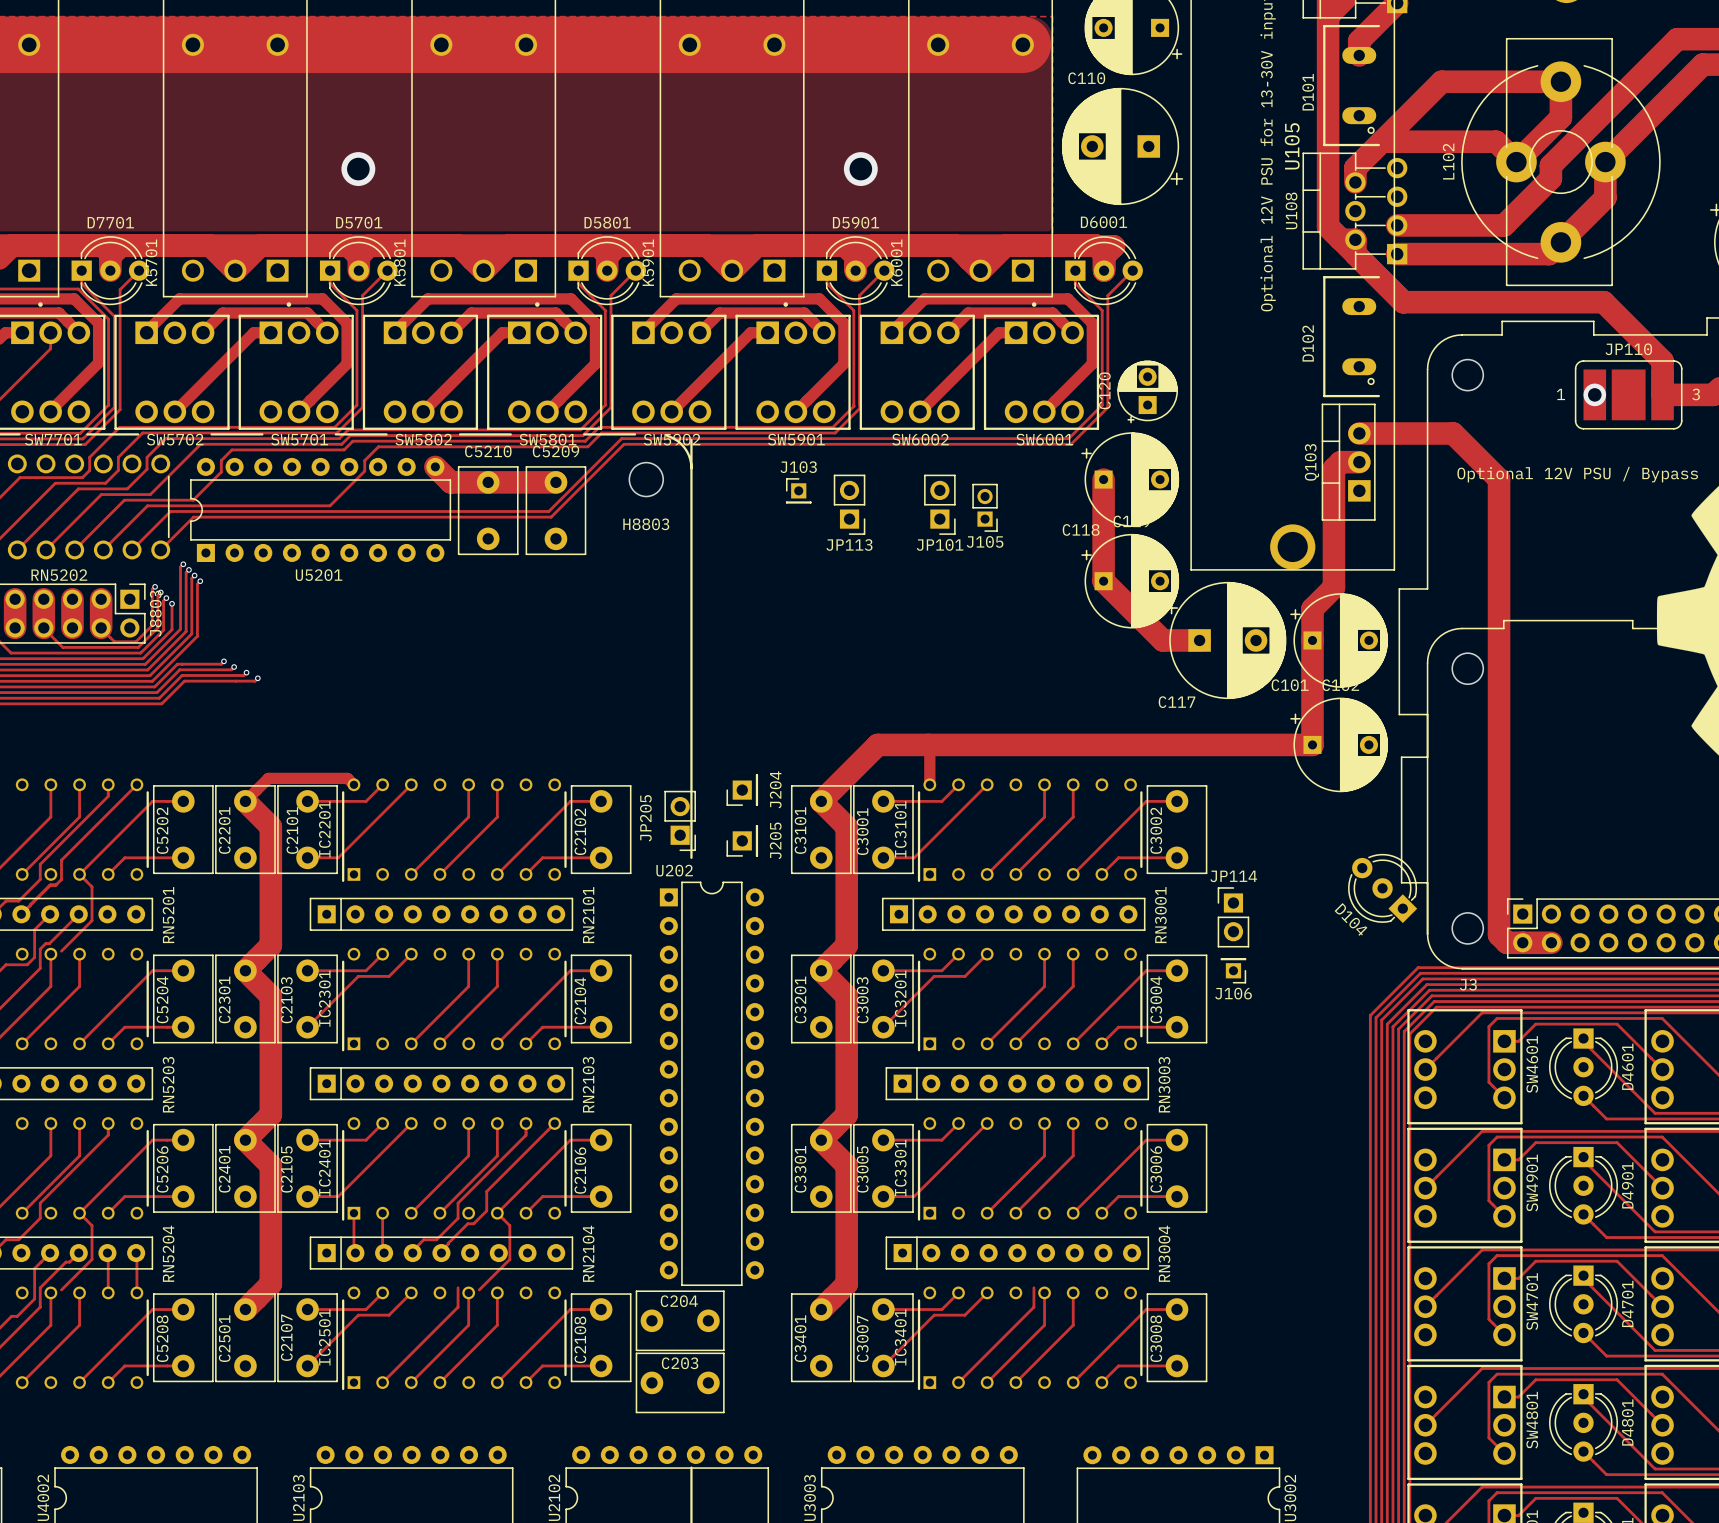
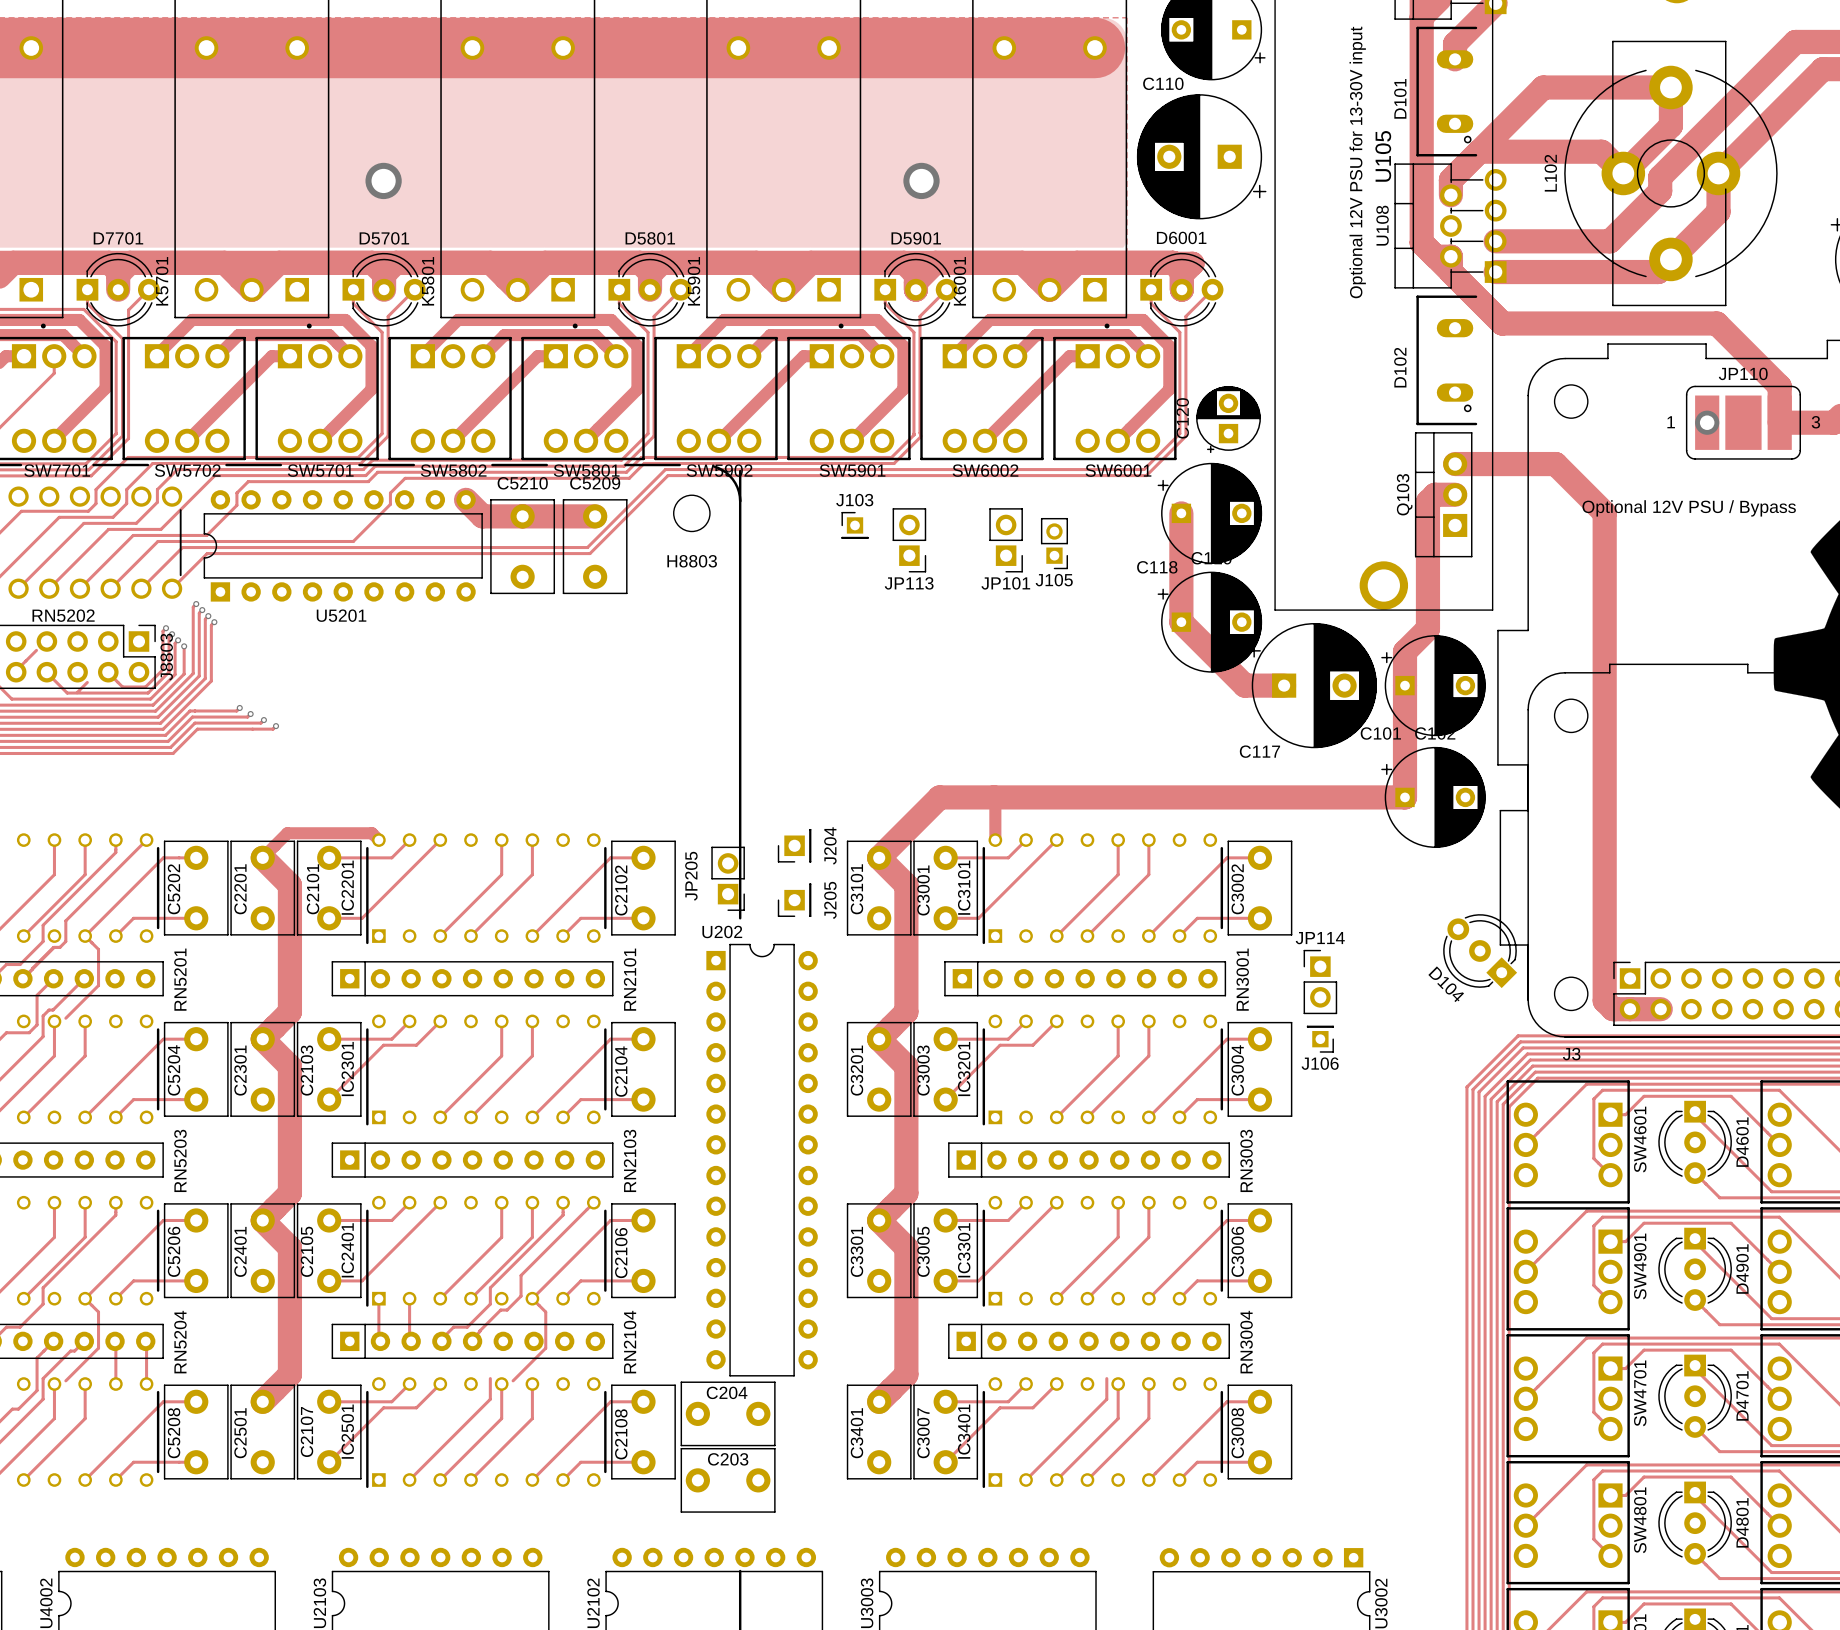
track: (15, 599) (15, 627) -> none
track: (43, 599) (43, 627) -> none
track: (72, 599) (72, 627) -> none
track: (101, 599) (101, 627) -> none
track: none -> (36, 650) (15, 671)
track: none -> (87, 682) (77, 692)

